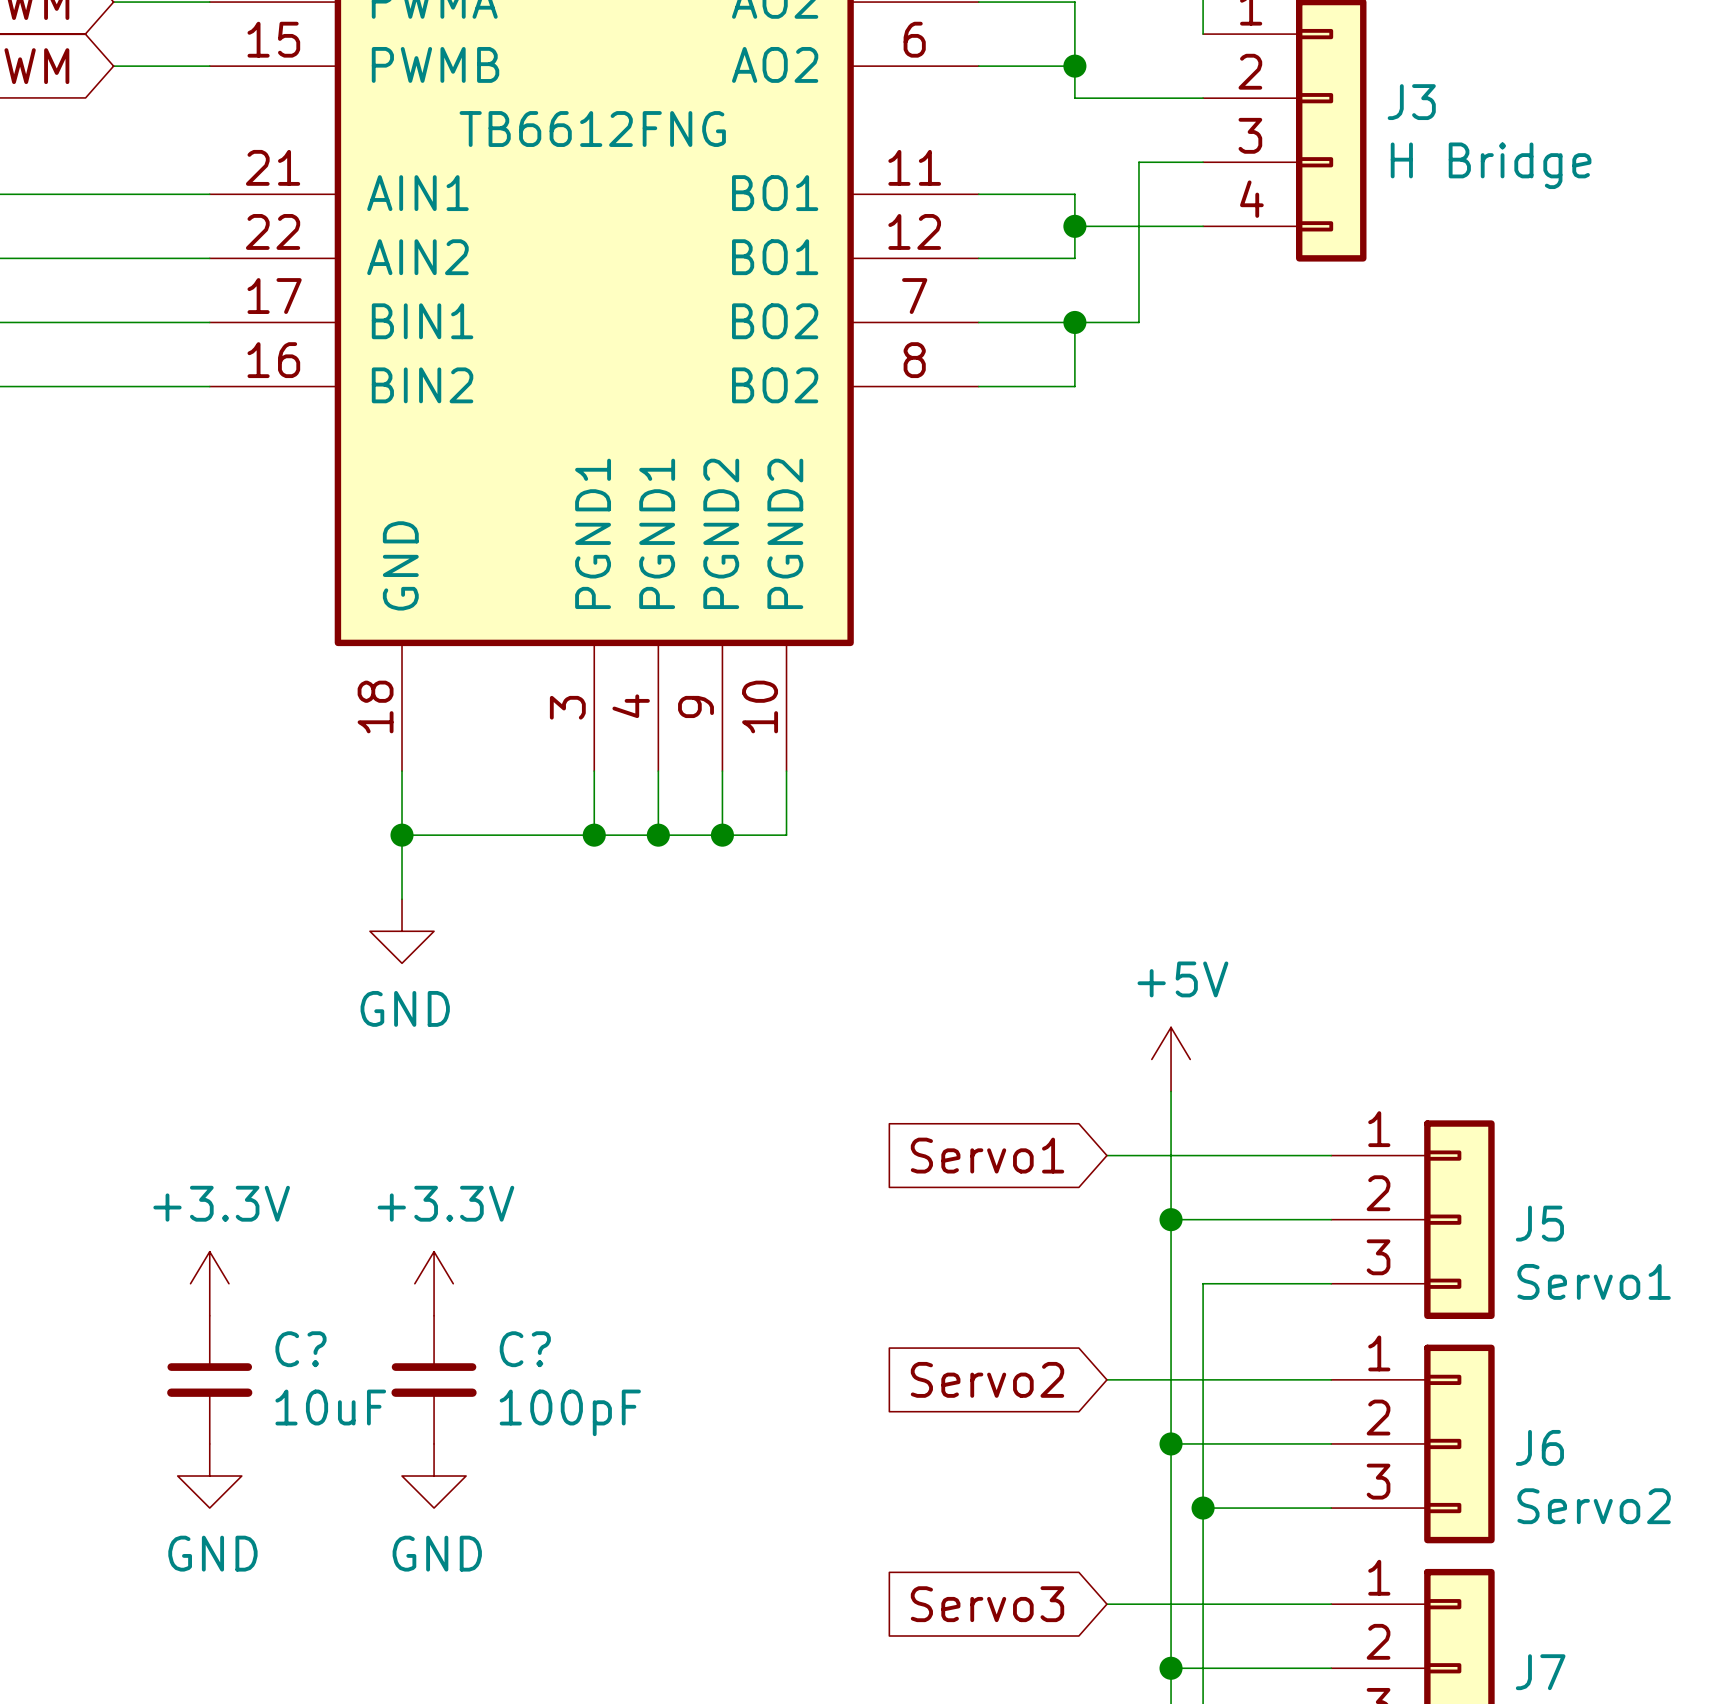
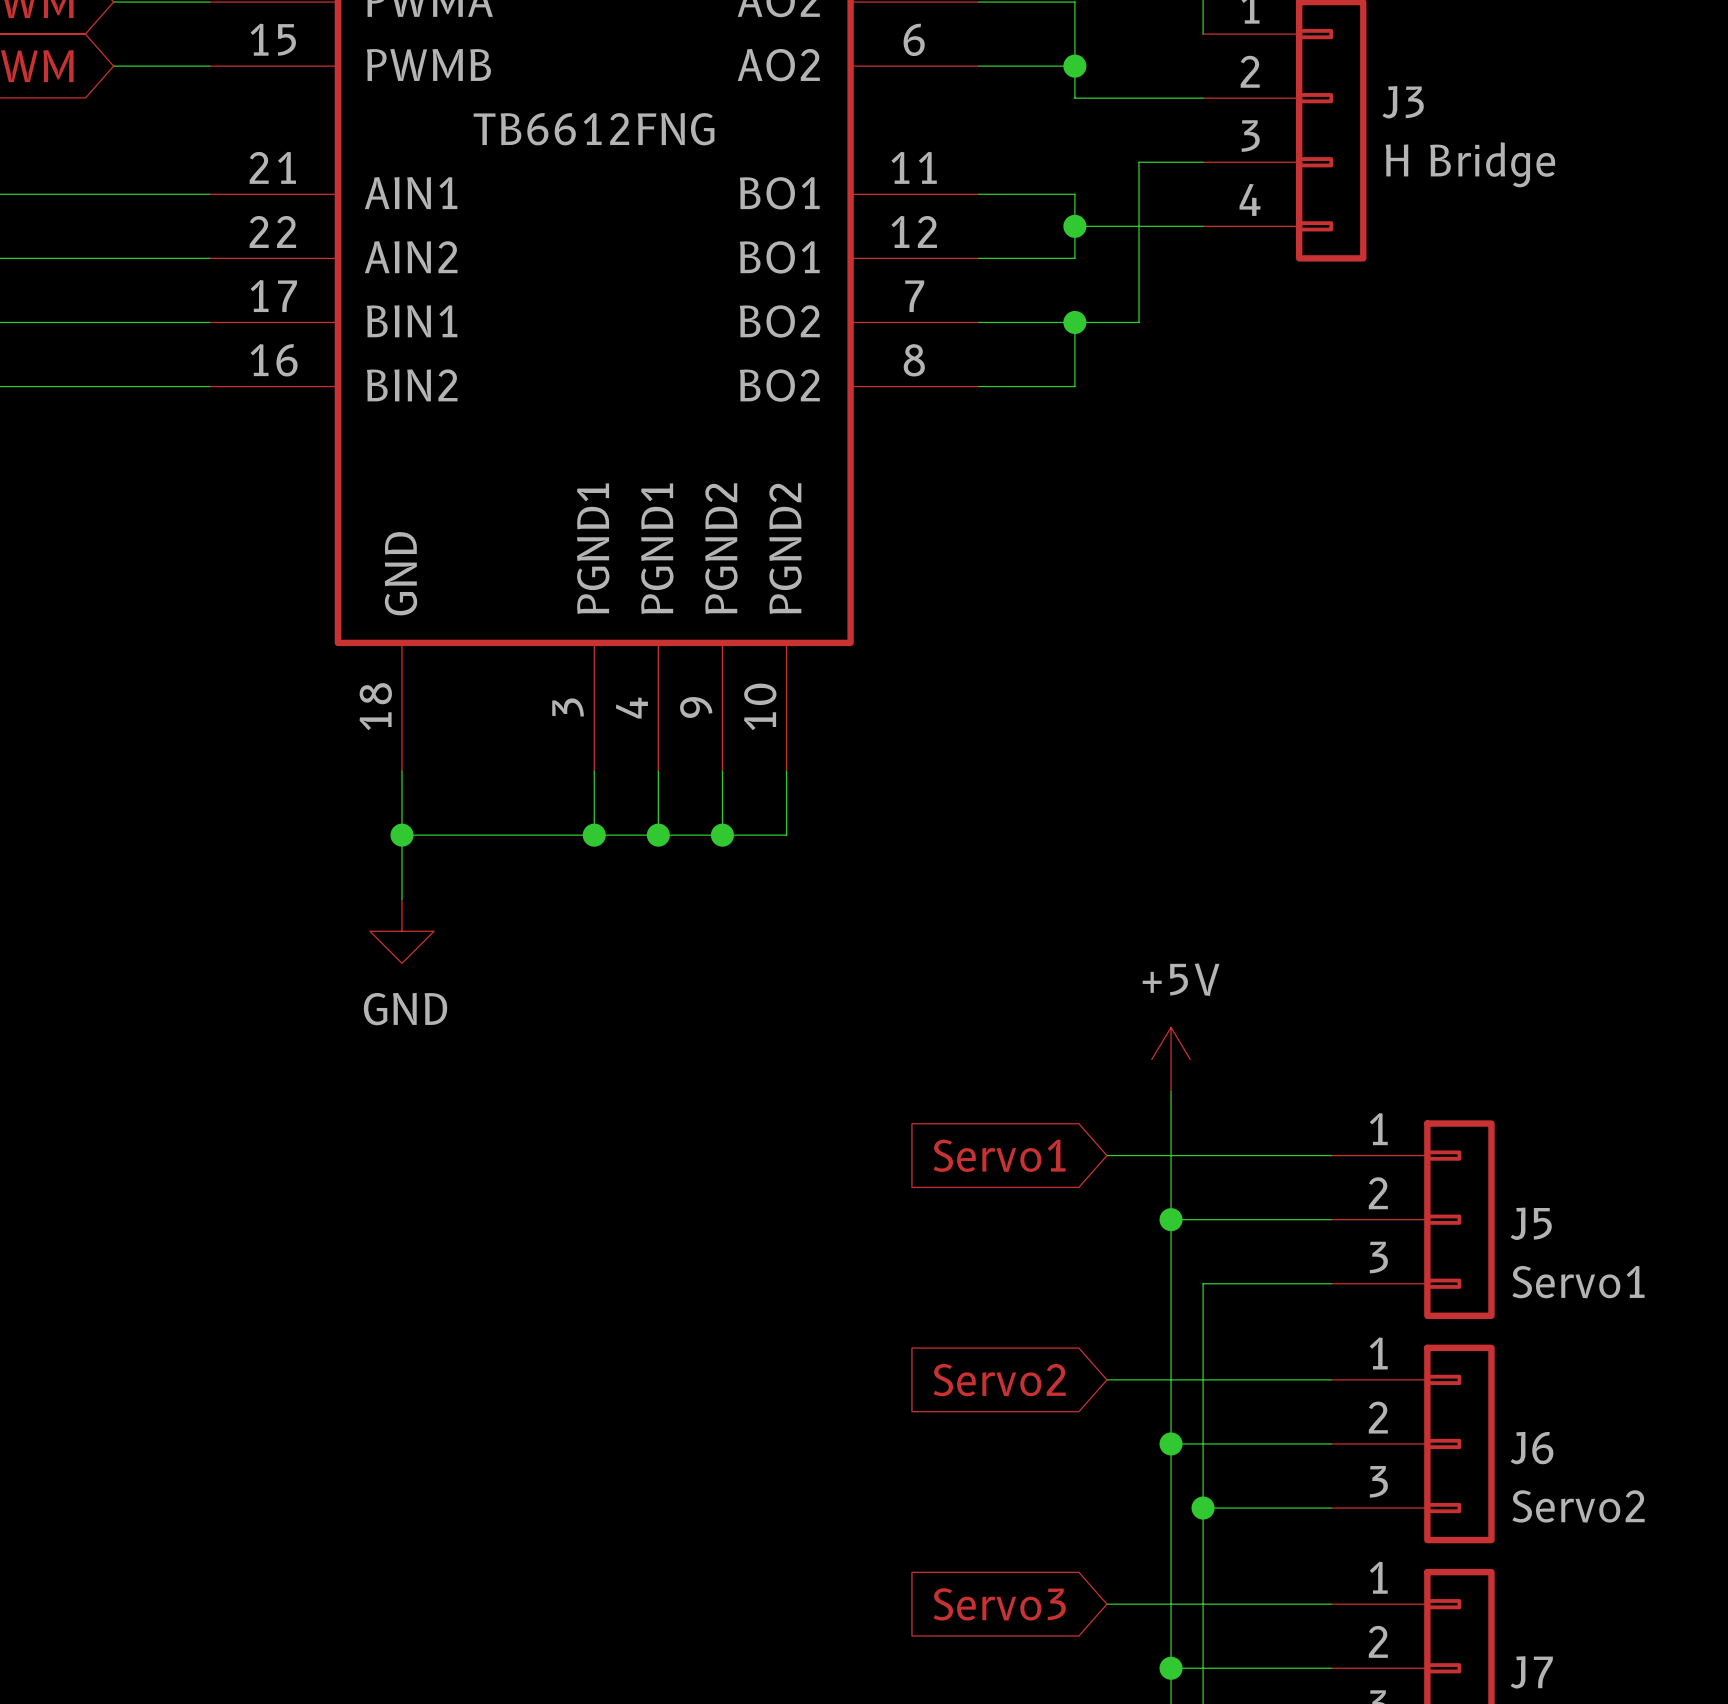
power symbol: +3.3V (209, 1283) -> none
power symbol: +3.3V (434, 1283) -> none
C?: 10uF (209, 1379) -> none
C?: 100pF (434, 1379) -> none
power symbol: GND (209, 1476) -> none
power symbol: GND (434, 1476) -> none

